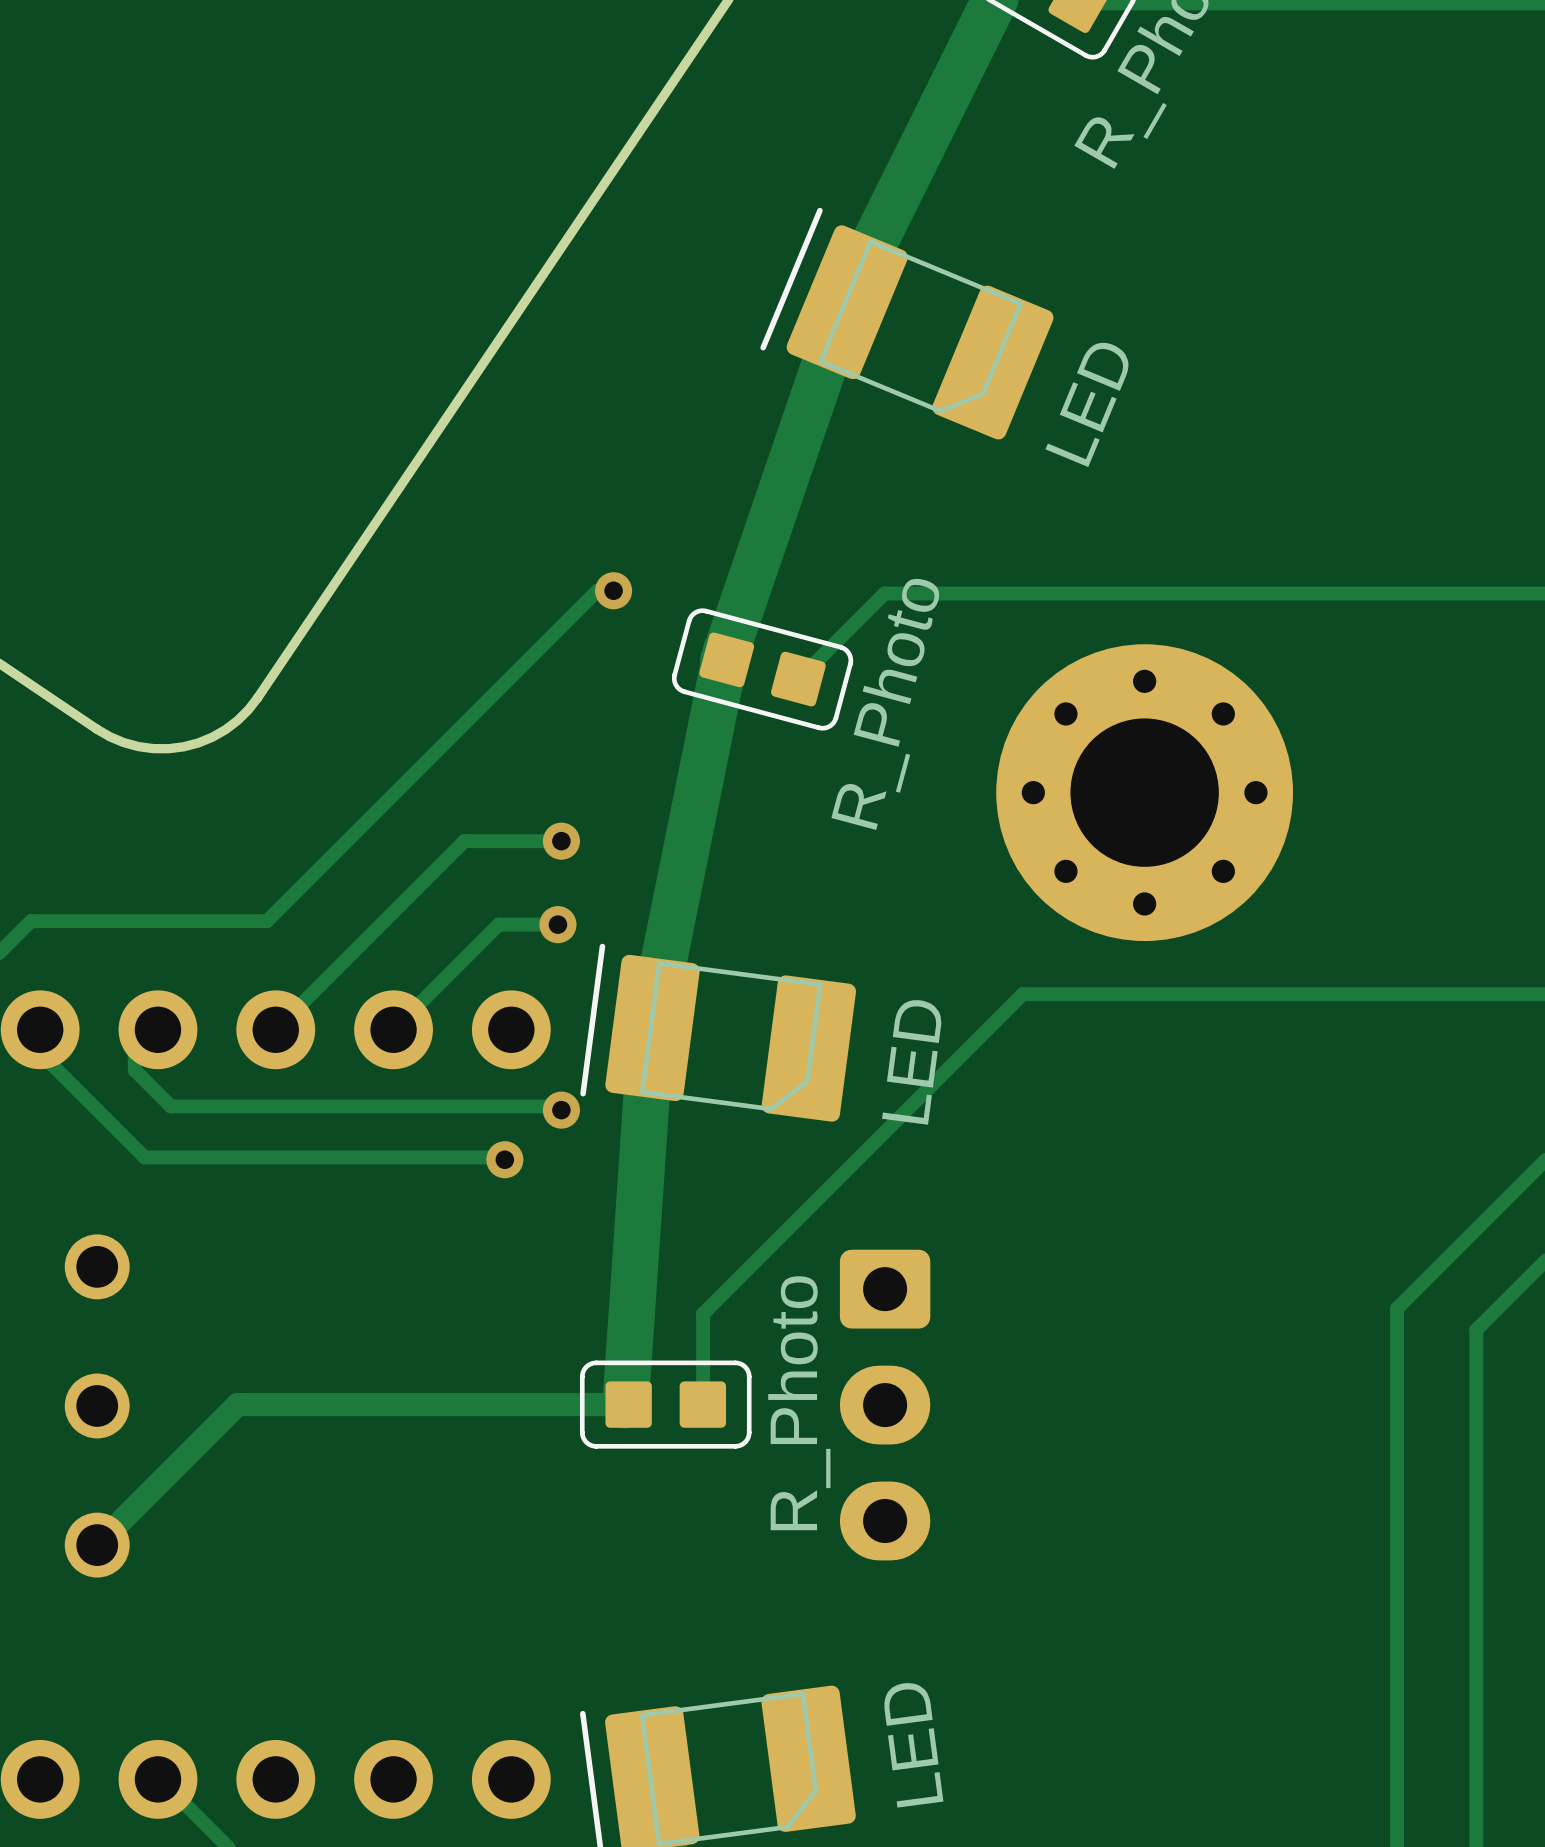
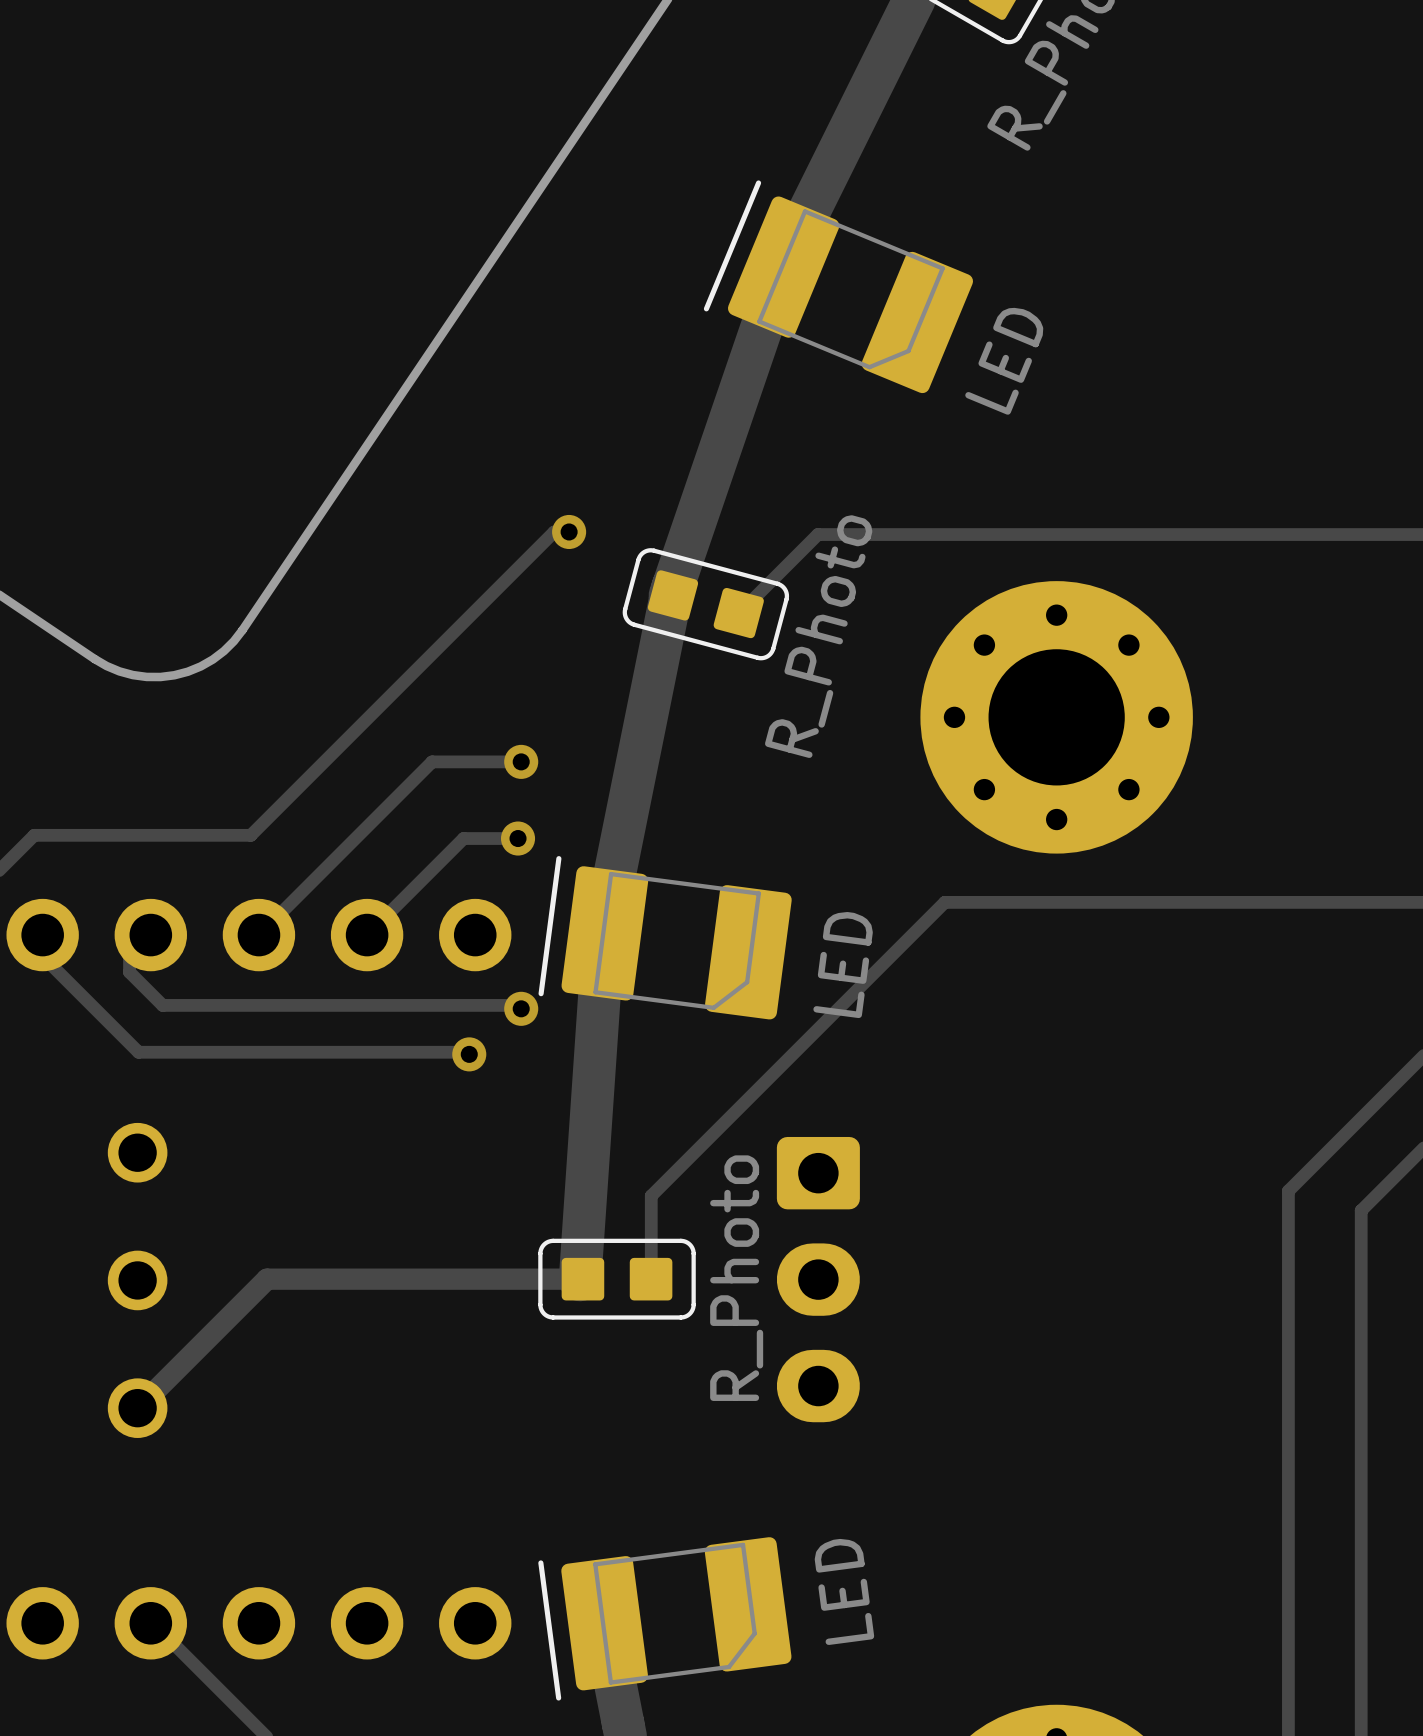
track: (284, 1404) (237, 1404) (97, 1545) -> (267, 1279) (138, 1408)
part position: (97, 1405) -> (137, 1280)

